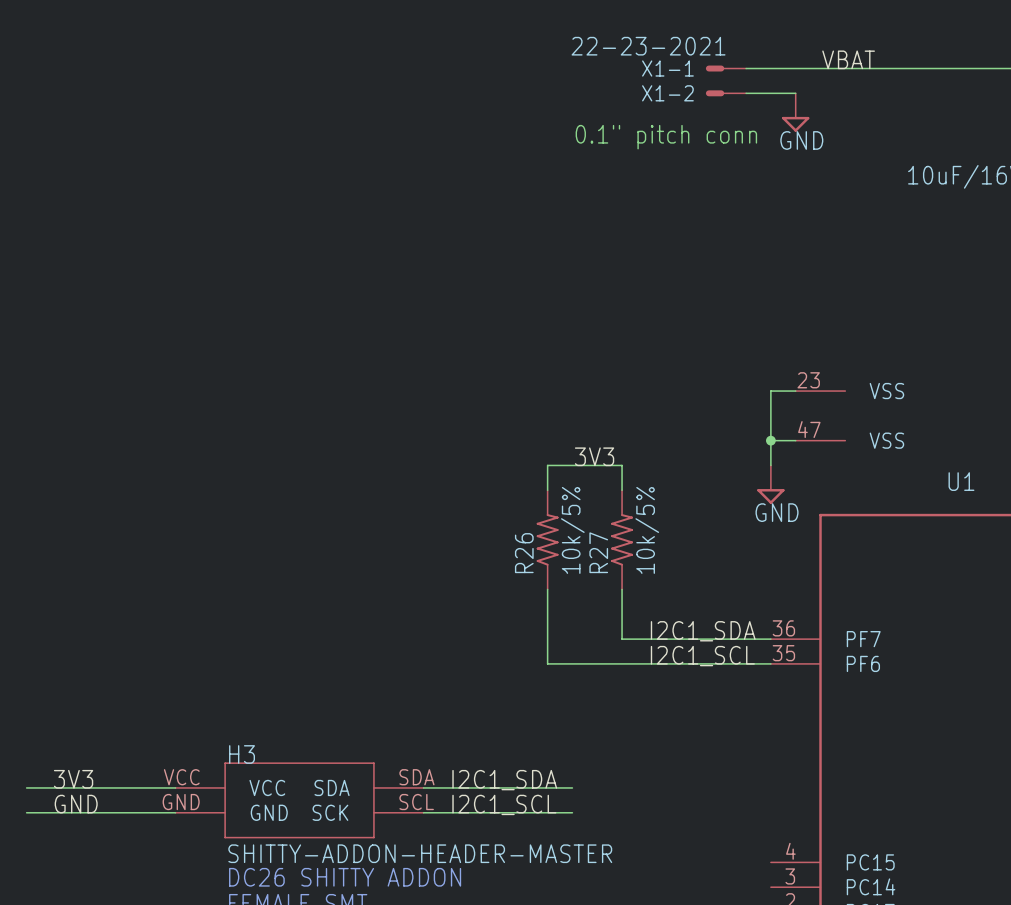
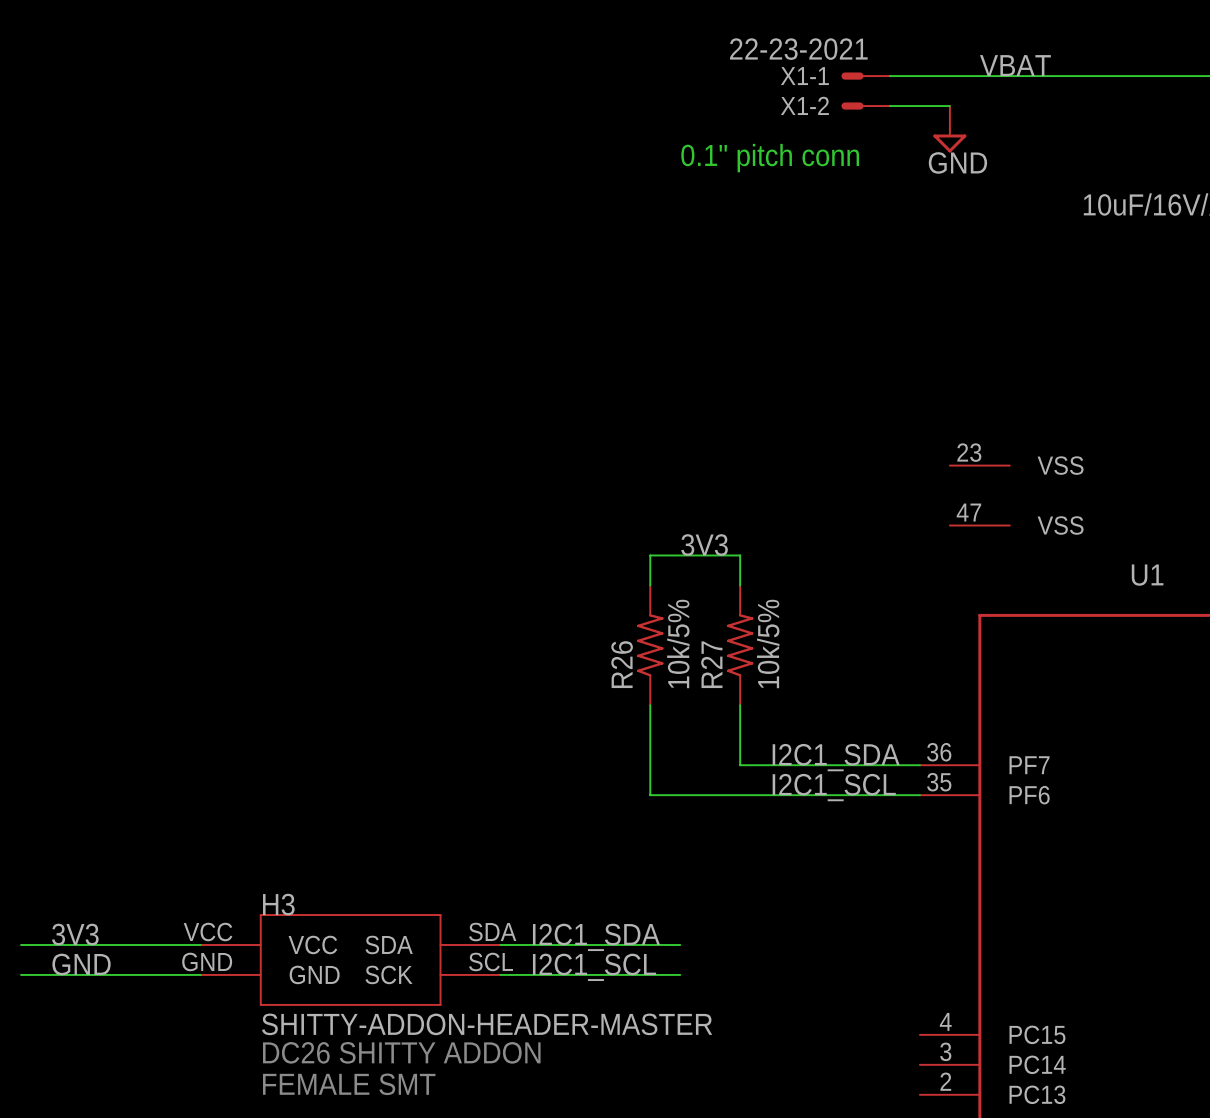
wire: (795, 391) (770, 391) (770, 465) -> none
wire: (770, 440) (795, 440) -> none
junction: (770, 440) -> none
power symbol: GND (770, 484) -> none

